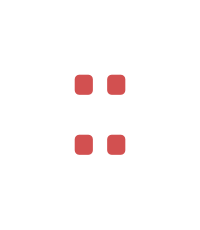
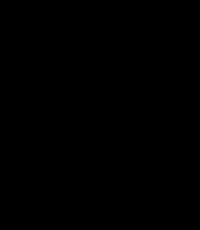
part: (100, 84) -> none
part: (100, 144) -> none

